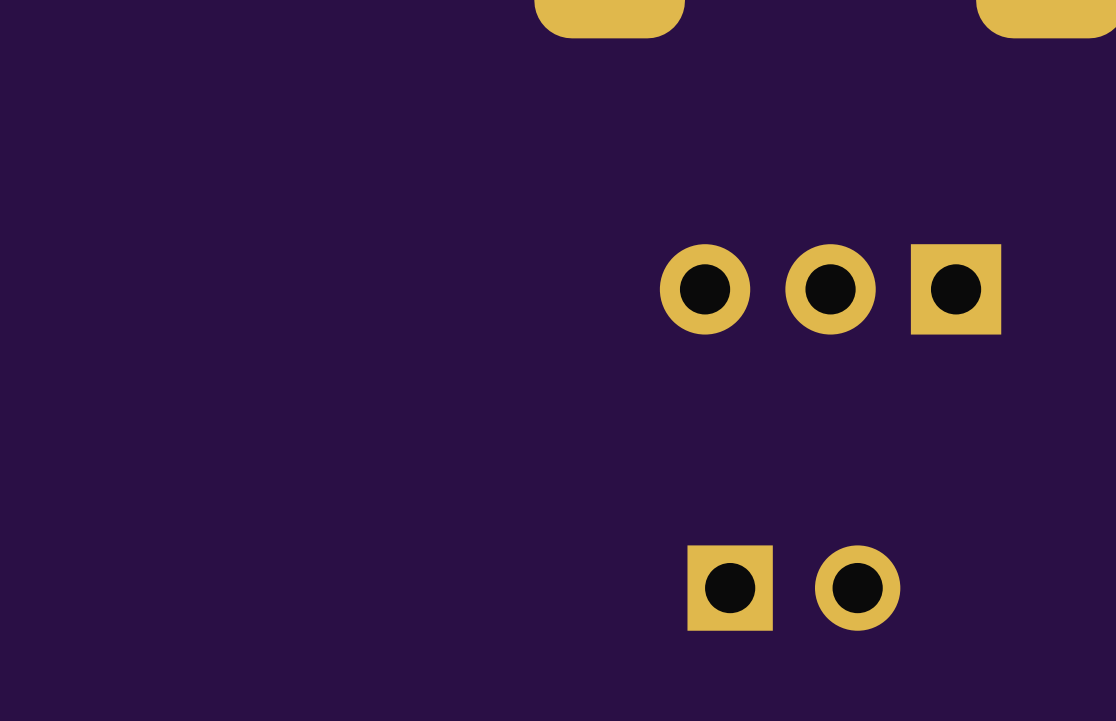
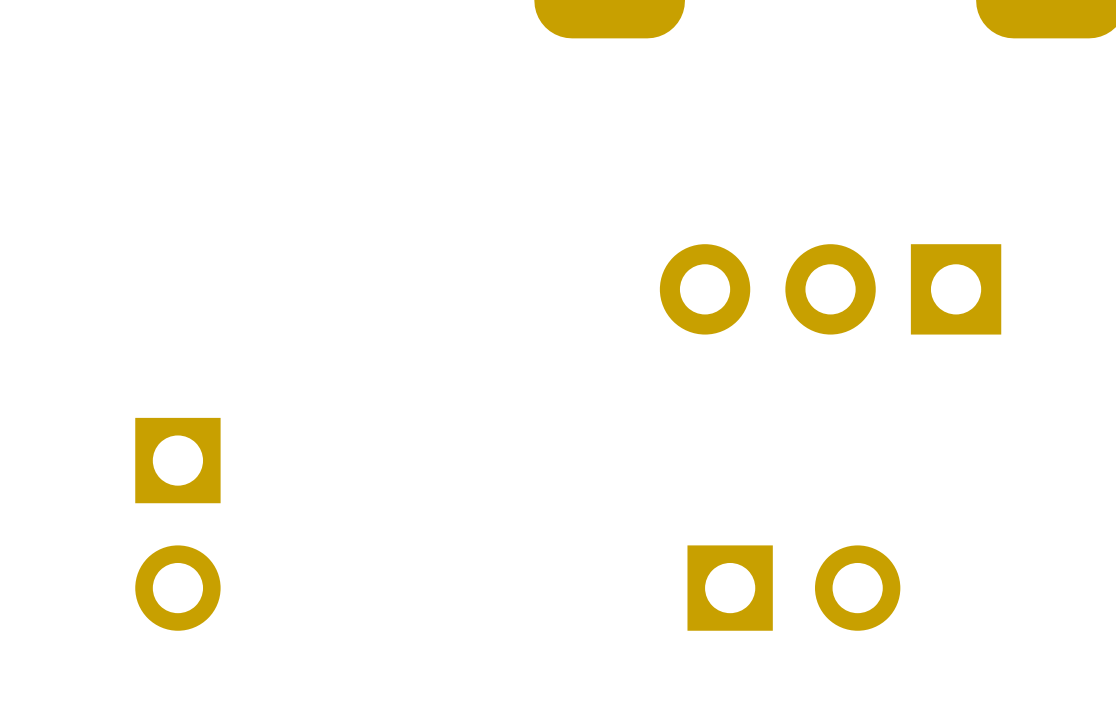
part: none -> (177, 524)

